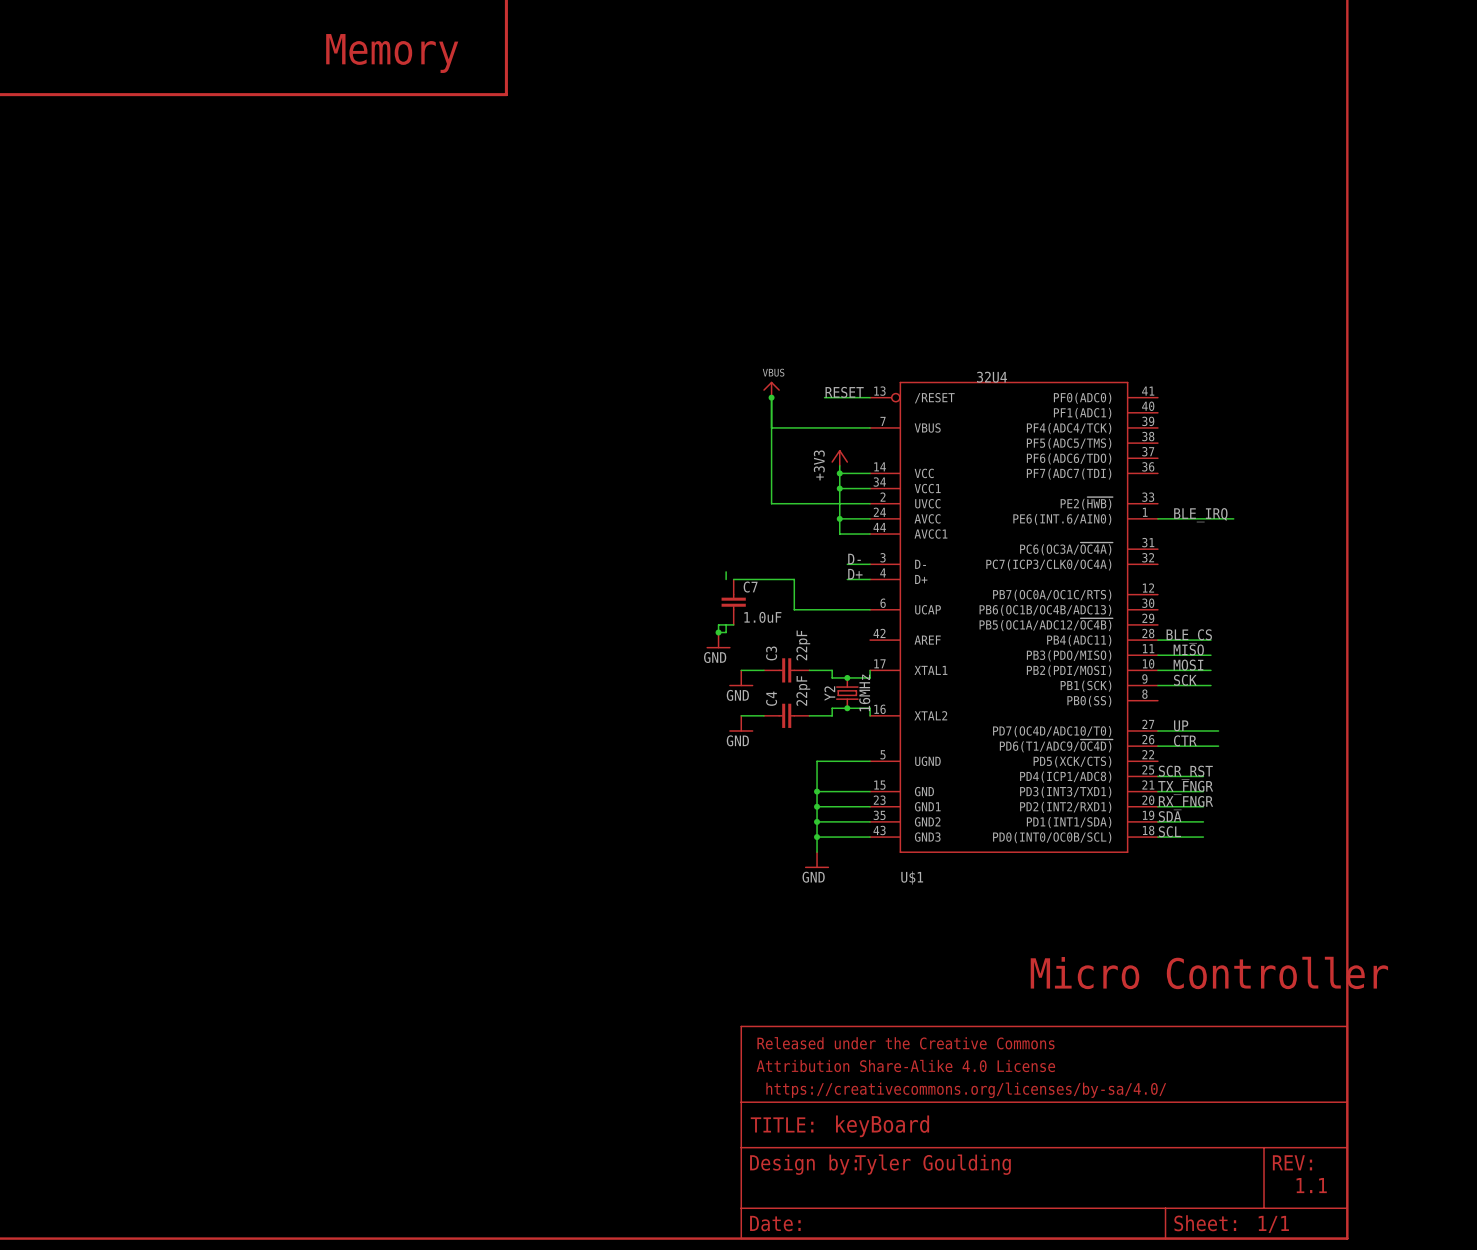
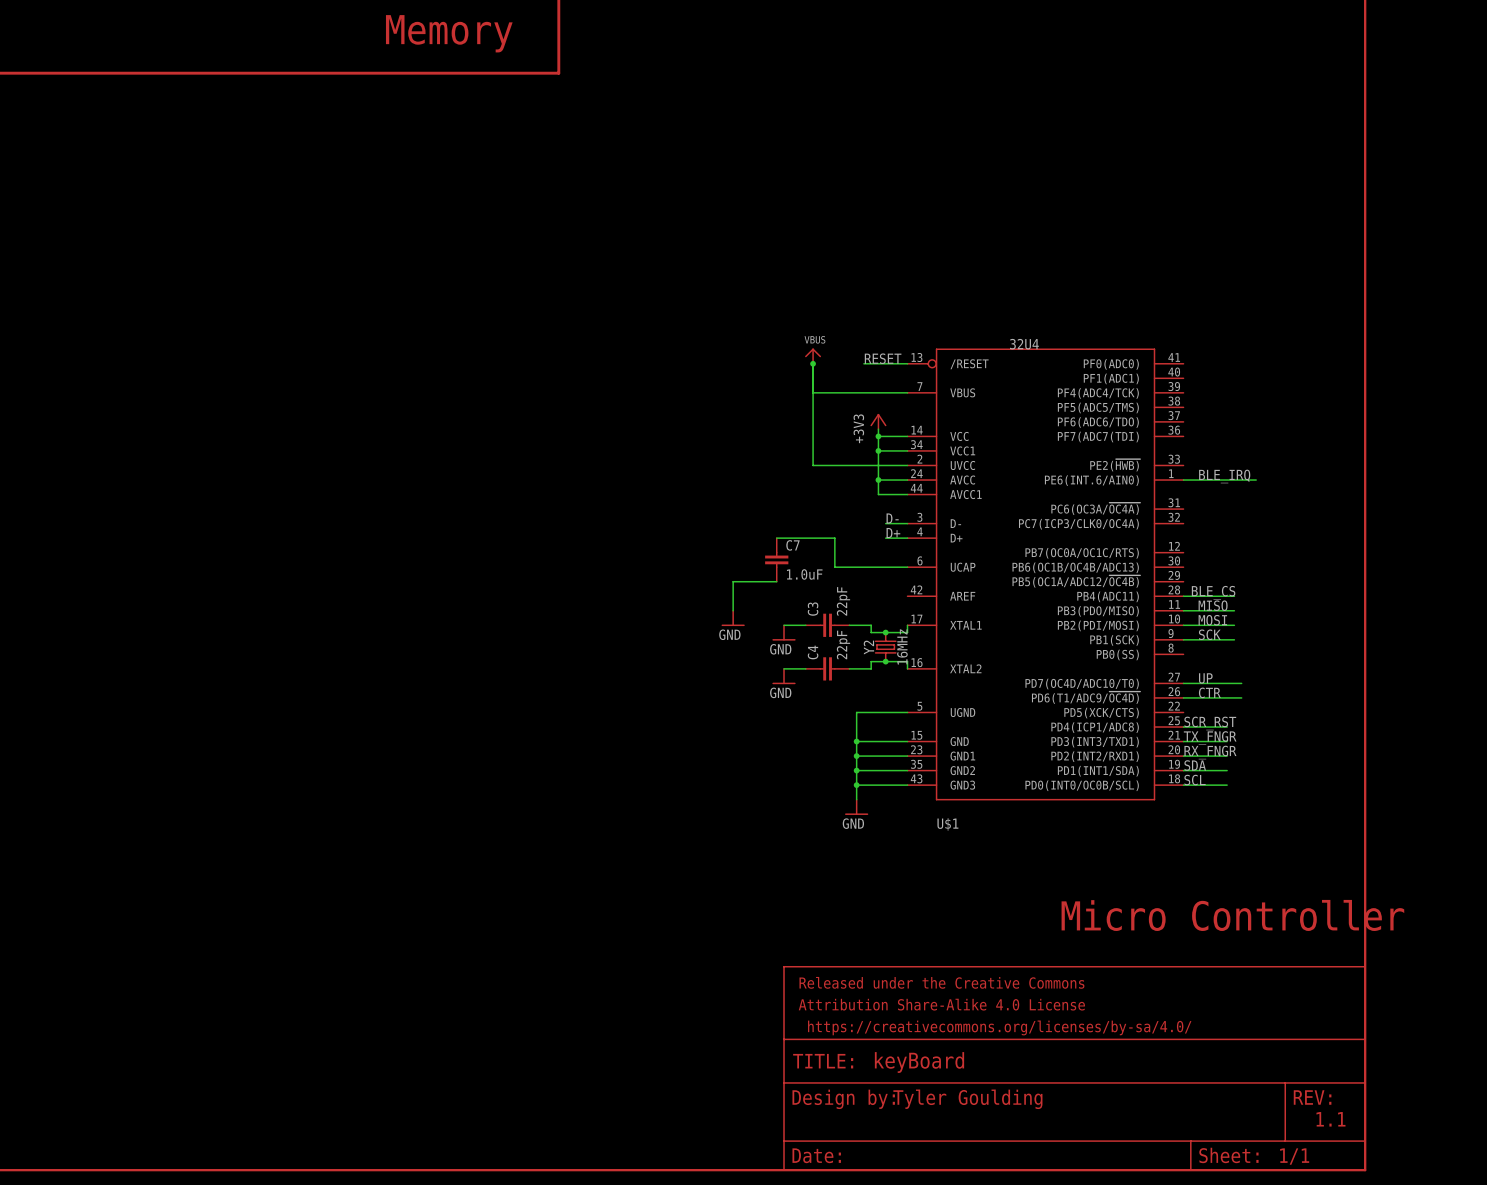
wire: (726, 571) (726, 579) -> none
wire: (718, 624) (718, 632) (726, 632) (726, 624) -> (762, 581) (733, 581) (733, 610)
junction: (718, 632) -> none
power symbol position: GND (718, 640) -> GND (733, 618)

